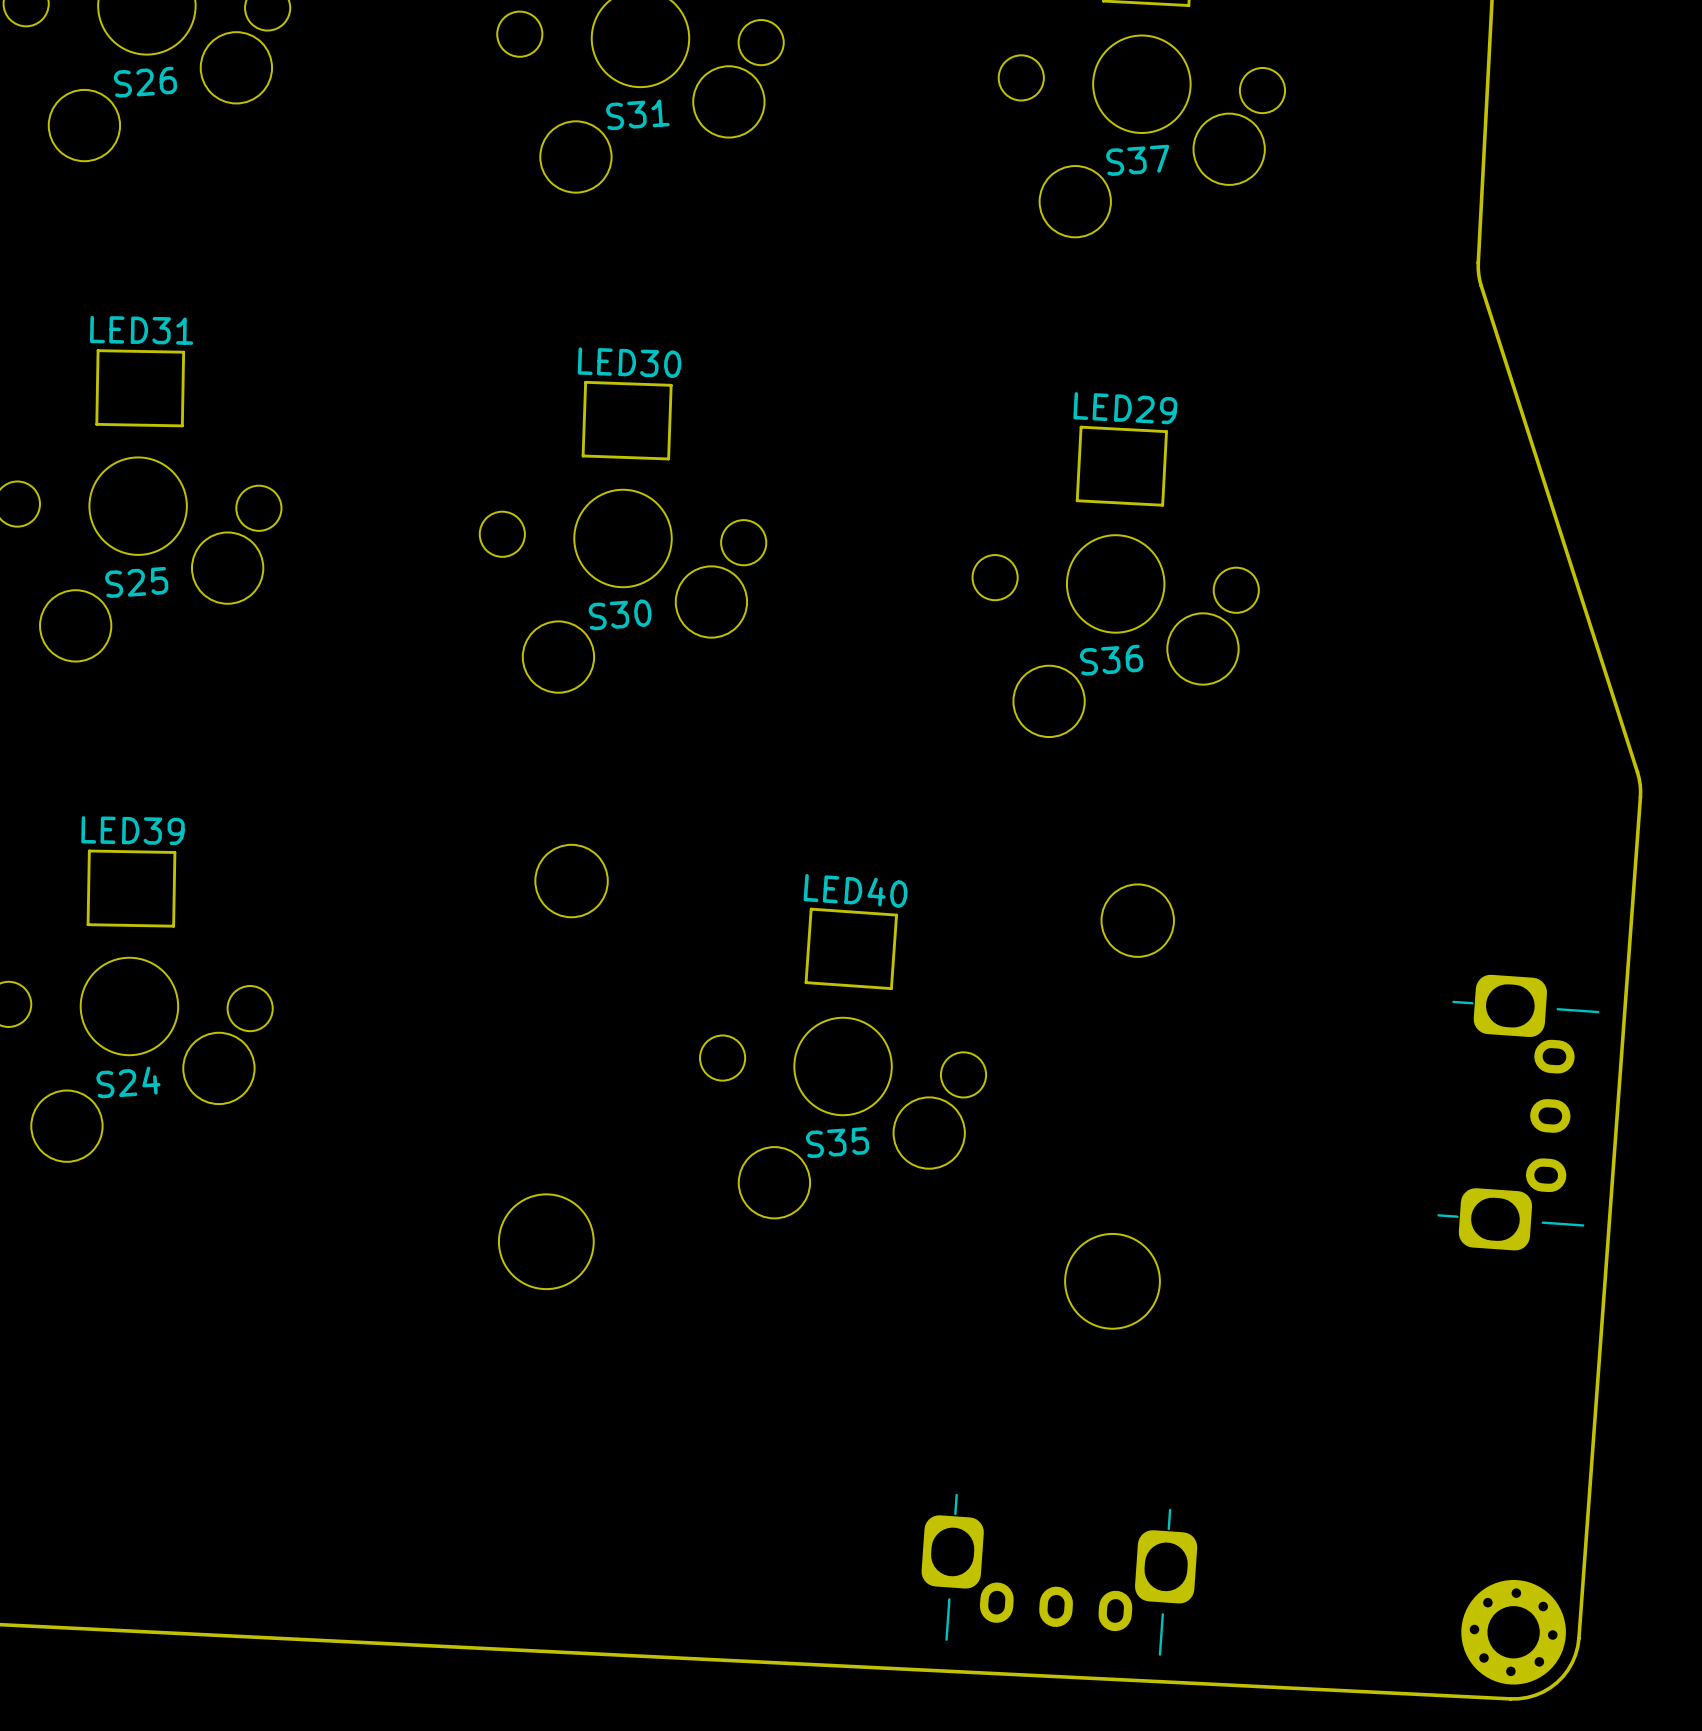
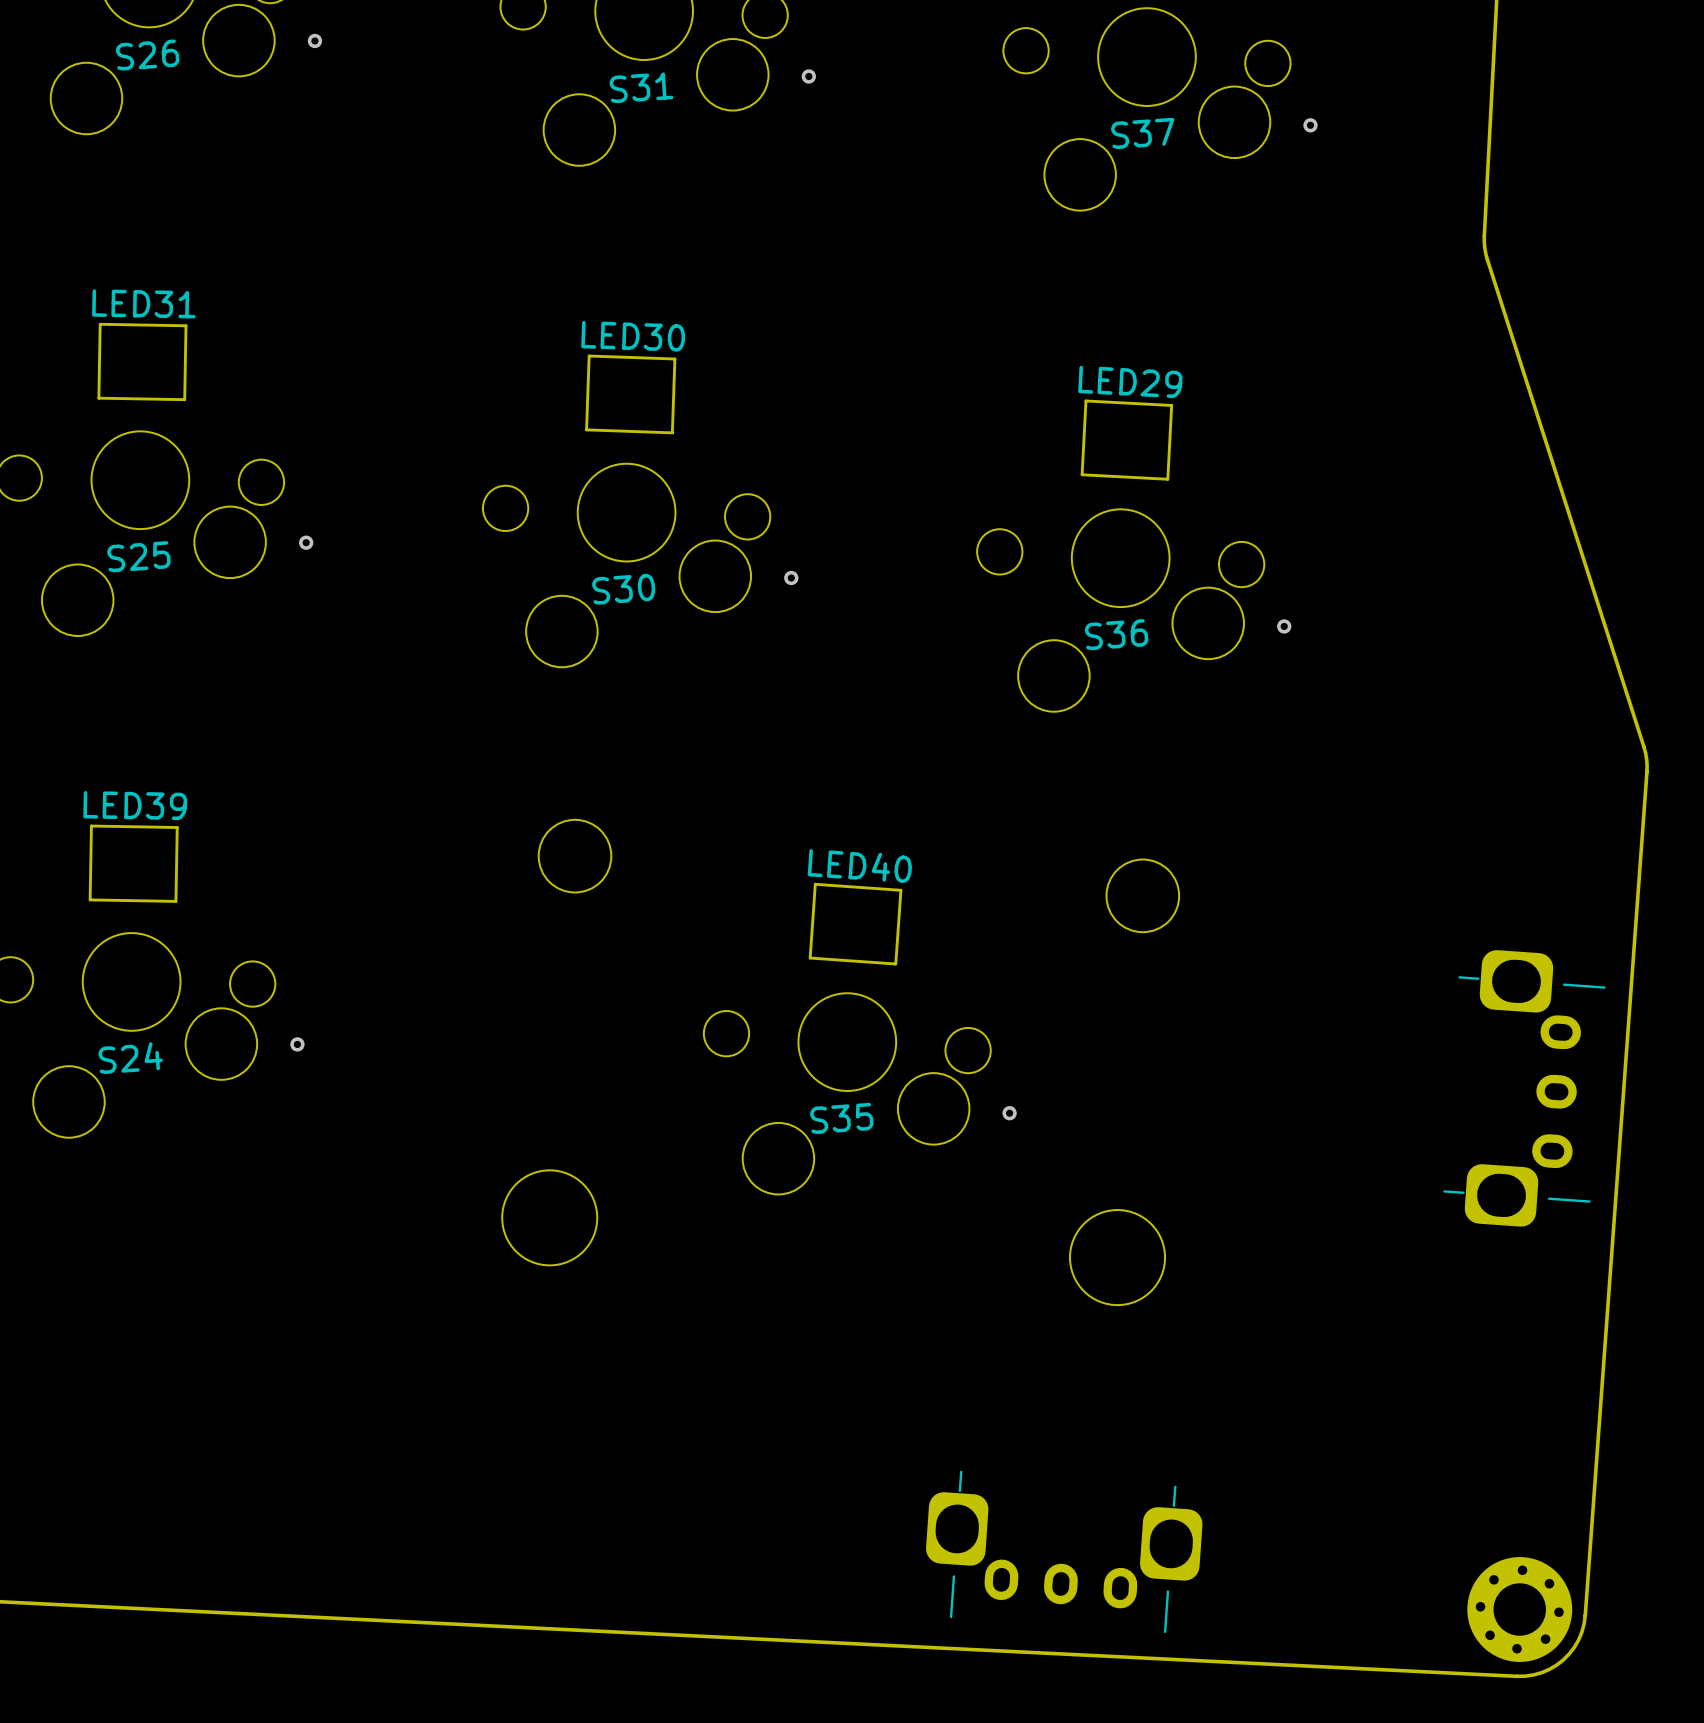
via: none -> (314, 40)
via: none -> (808, 76)
via: none -> (1310, 125)
via: none -> (306, 542)
via: none -> (791, 577)
via: none -> (1284, 626)
via: none -> (297, 1044)
via: none -> (1009, 1113)

